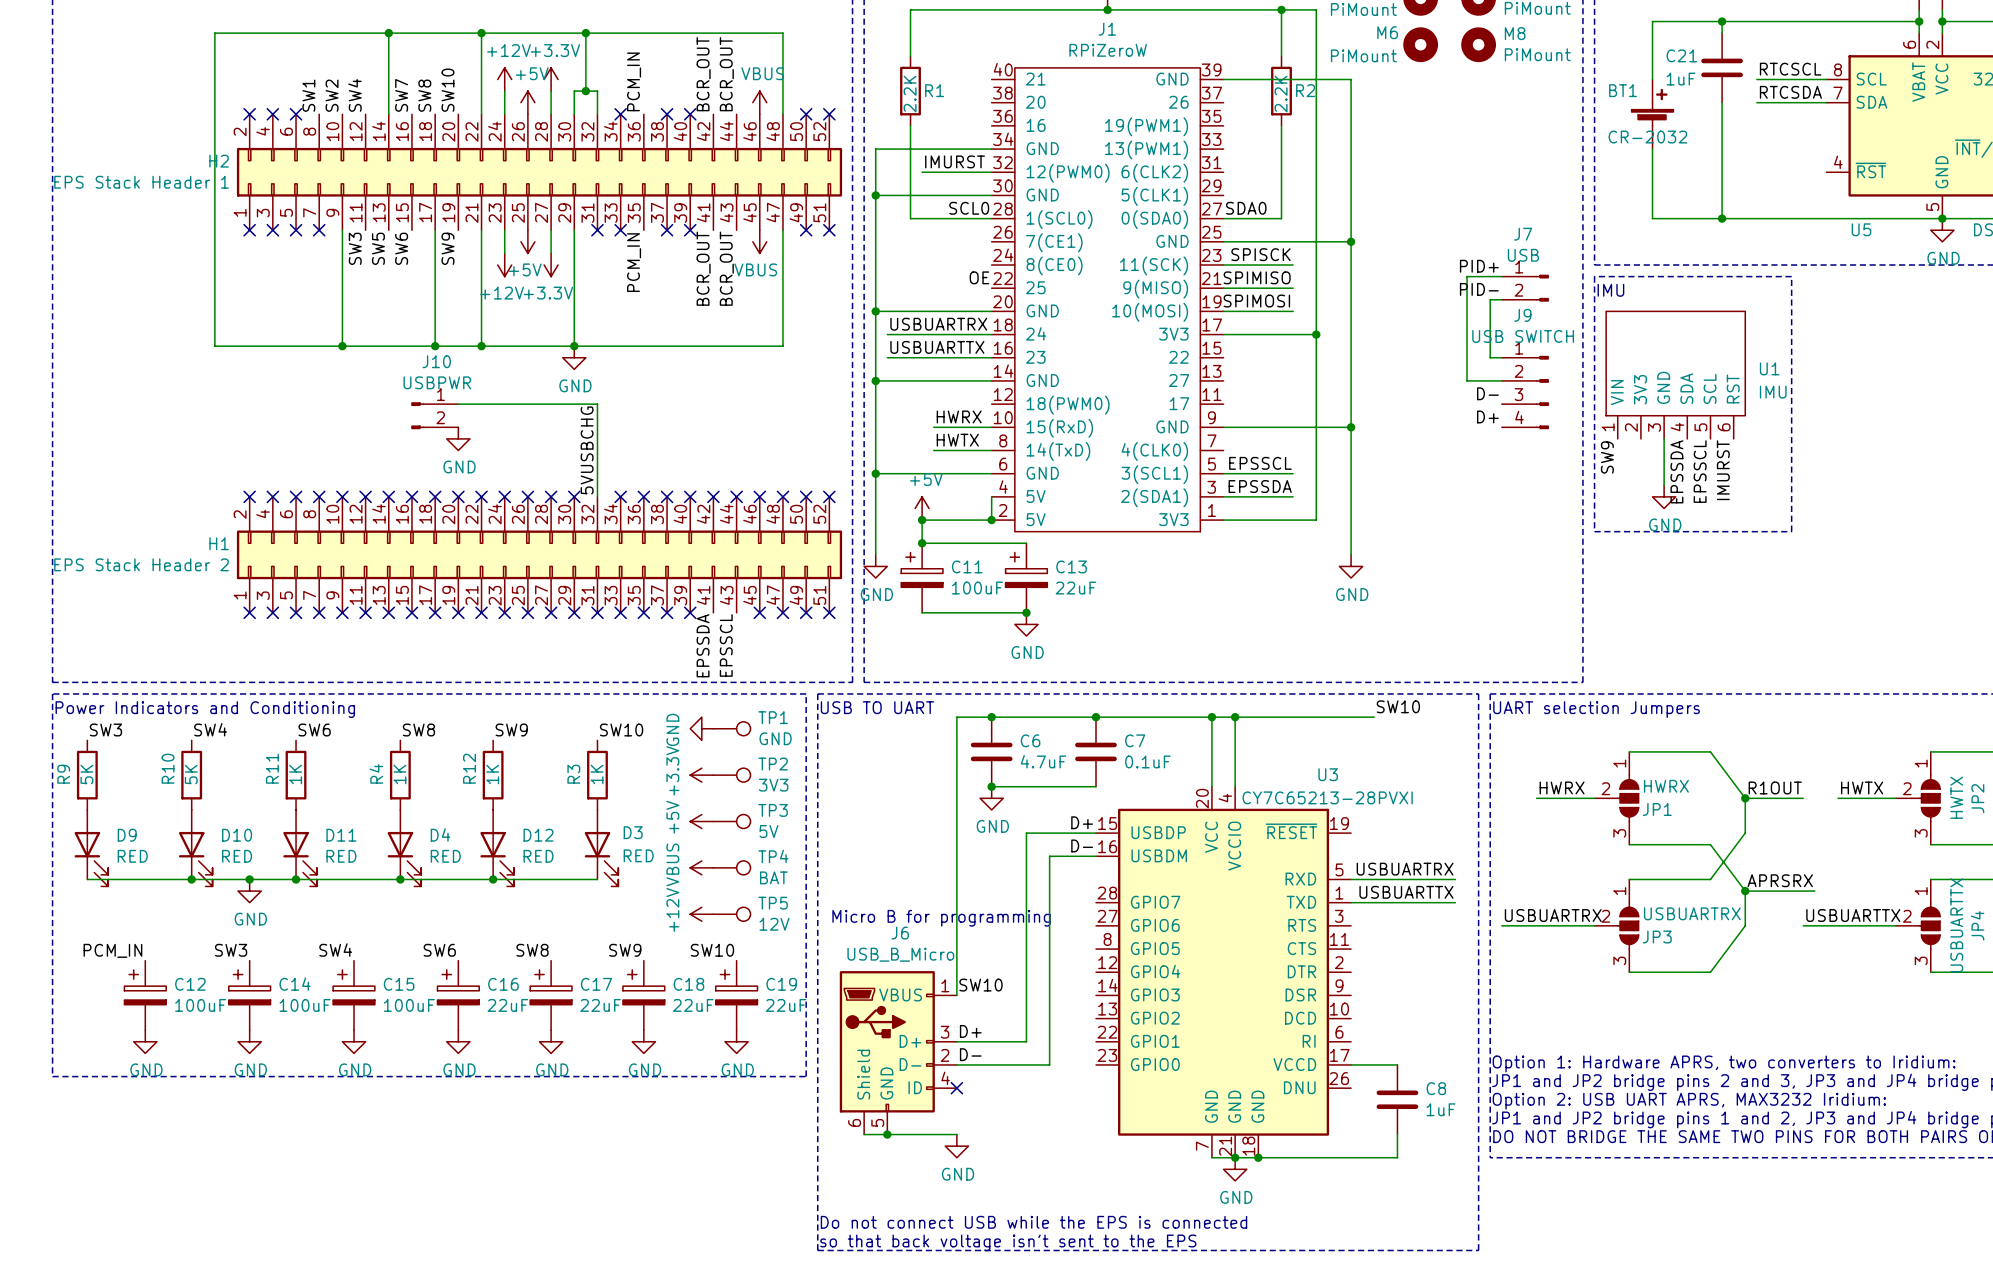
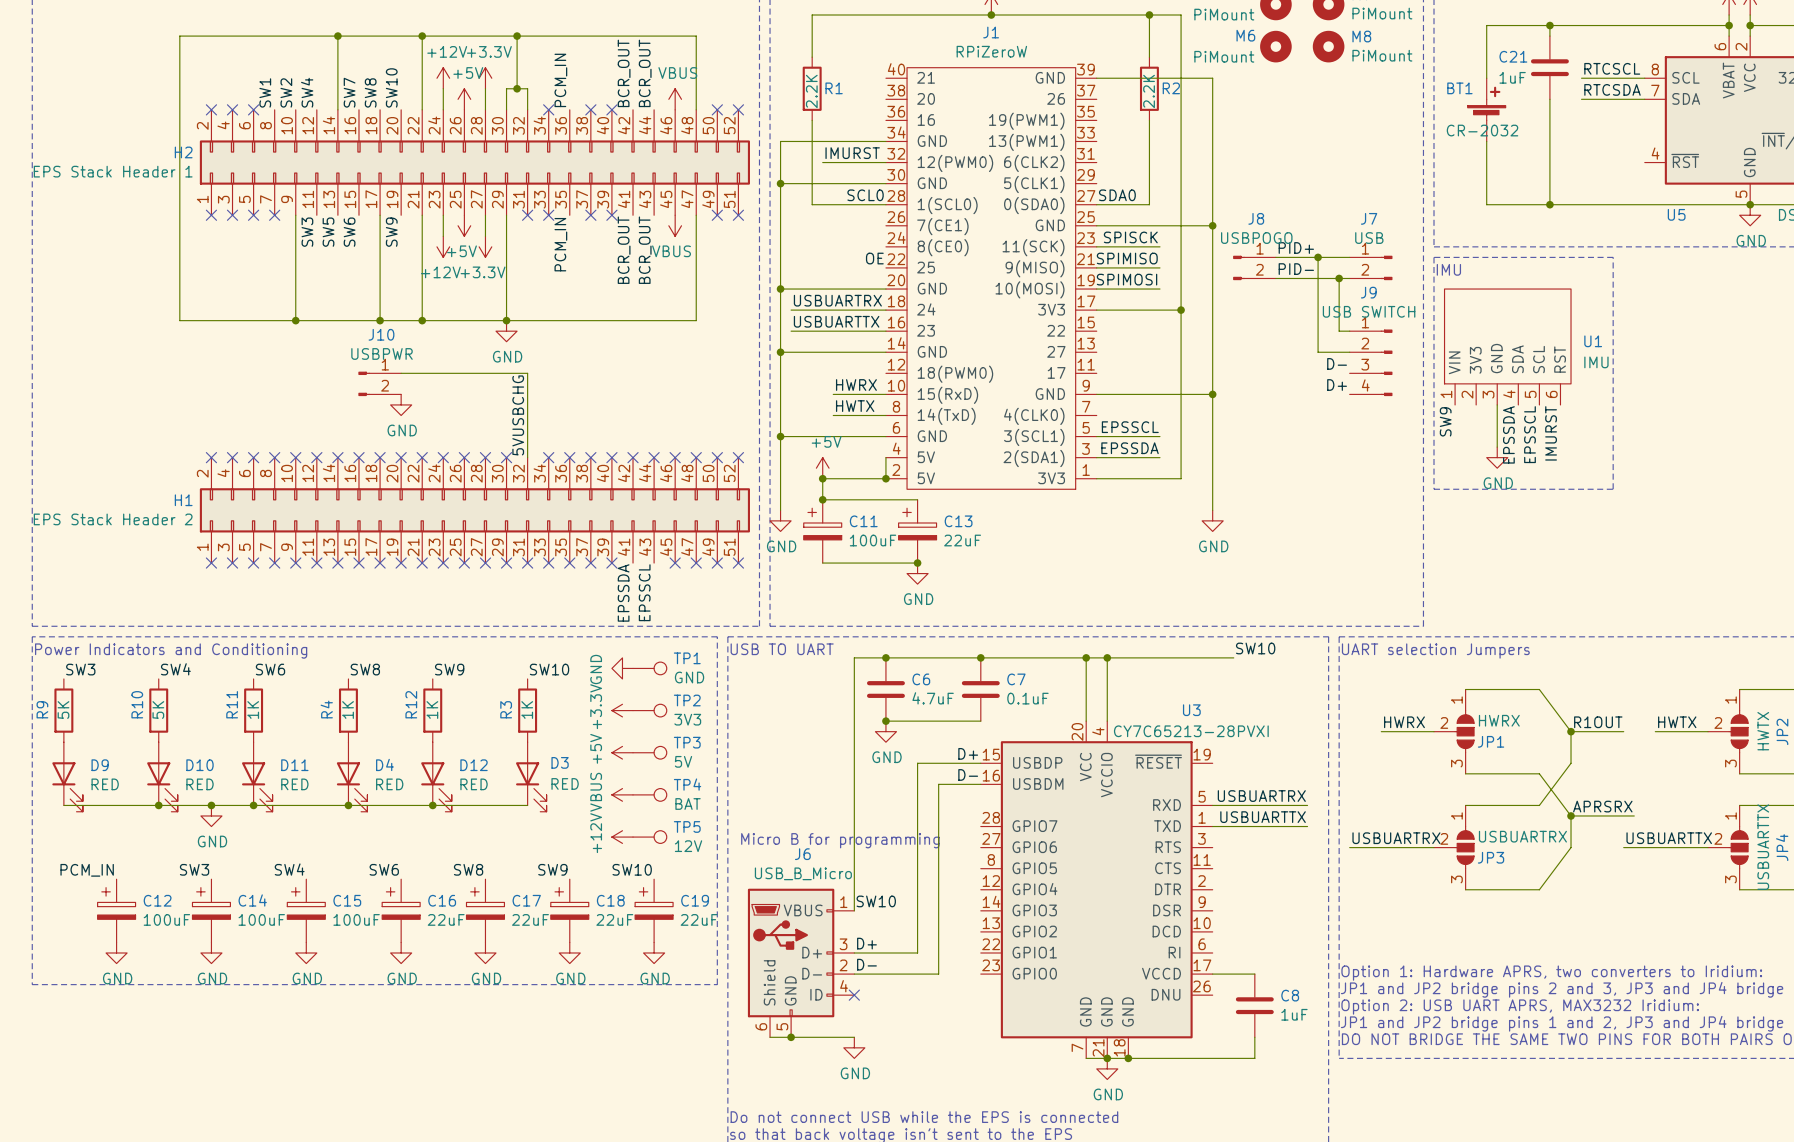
label position: PID+ (1479, 266) -> PID+ (1296, 247)
wire: none -> (1275, 257) (1318, 257)
junction: none -> (1318, 257)
J8: none -> USBPOGO (1254, 267)
label position: PID- (1479, 289) -> PID- (1296, 269)
wire: none -> (1275, 278) (1339, 278)
junction: none -> (1339, 278)

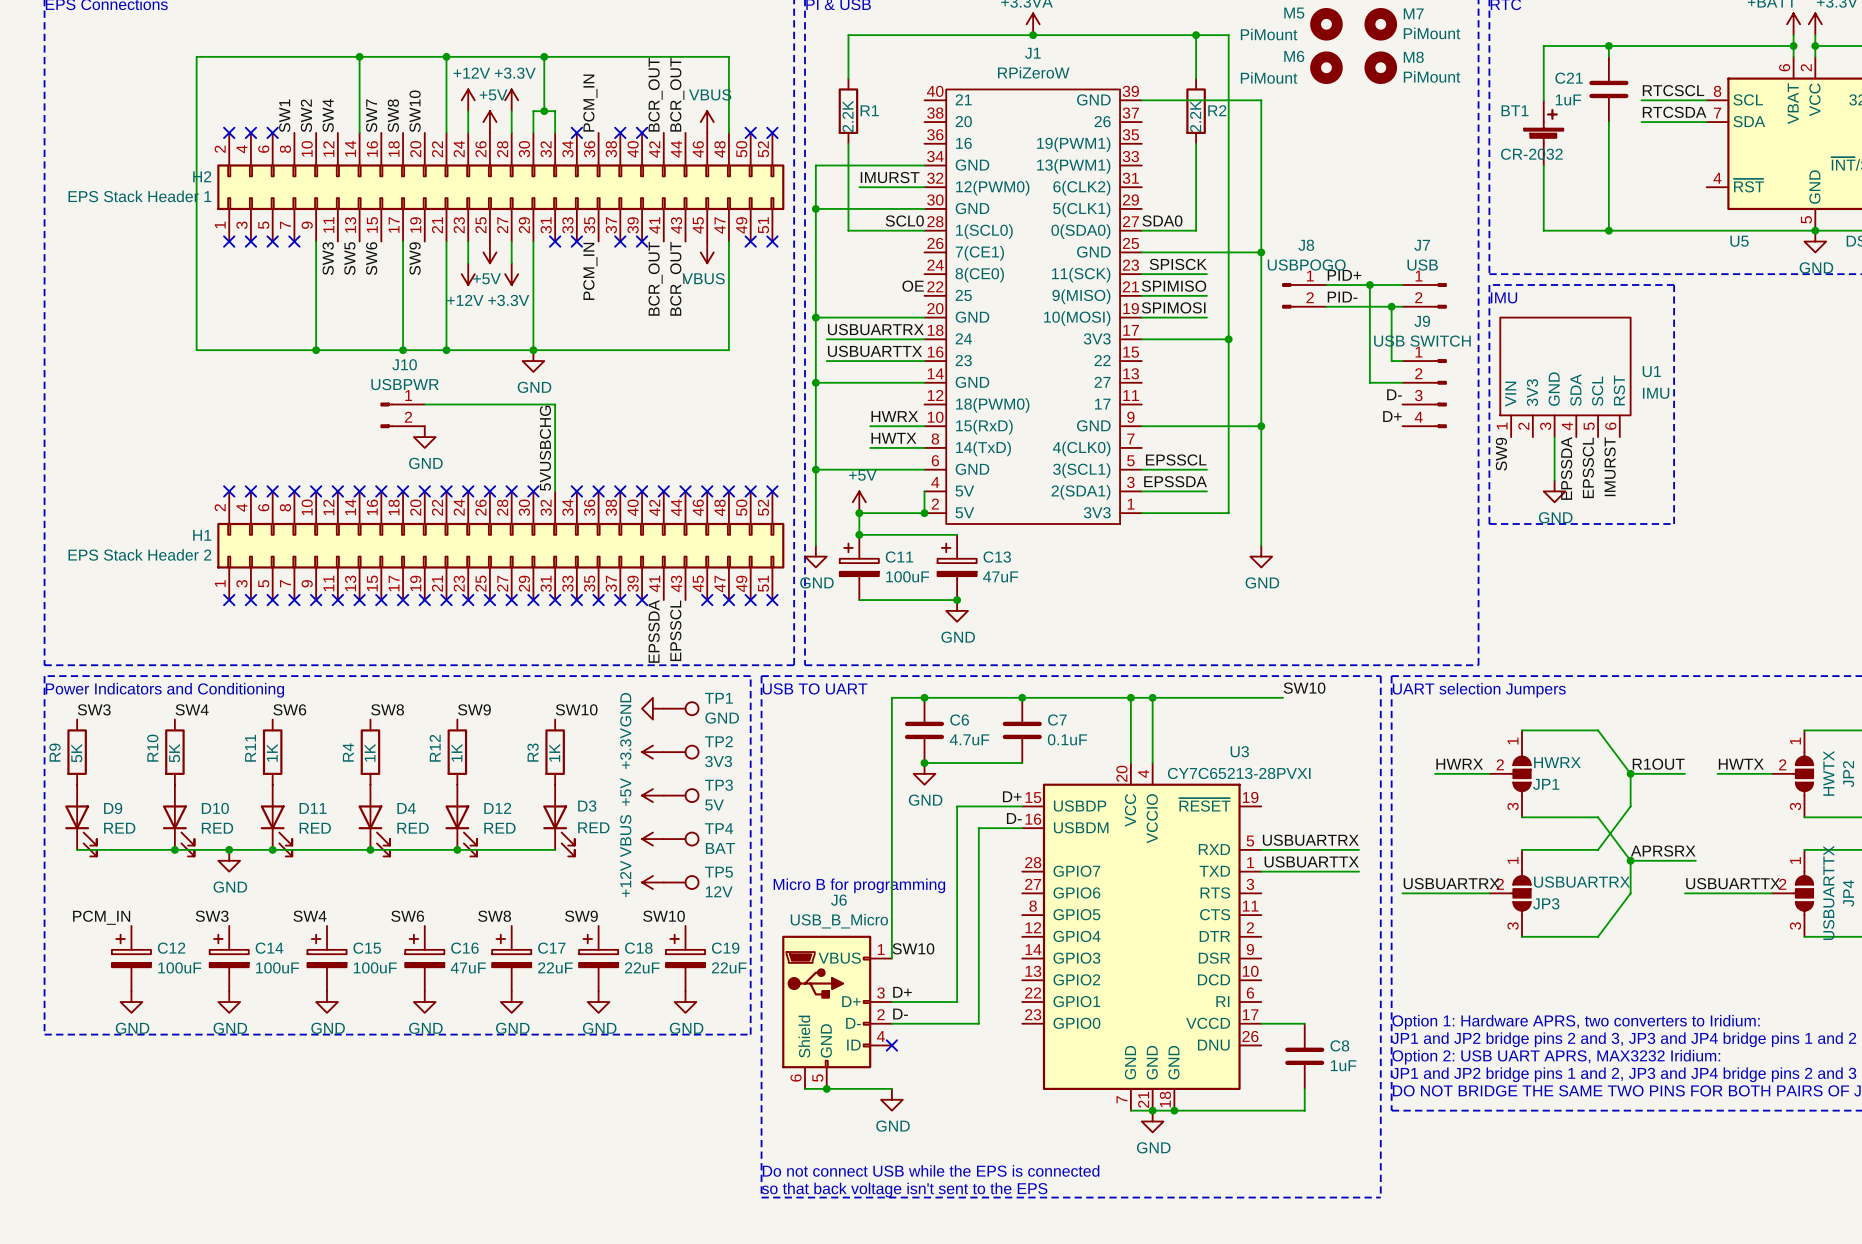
C13 value: 22uF (962, 540) -> 47uF (1000, 576)
C16 value: 22uF (446, 919) -> 47uF (468, 968)

